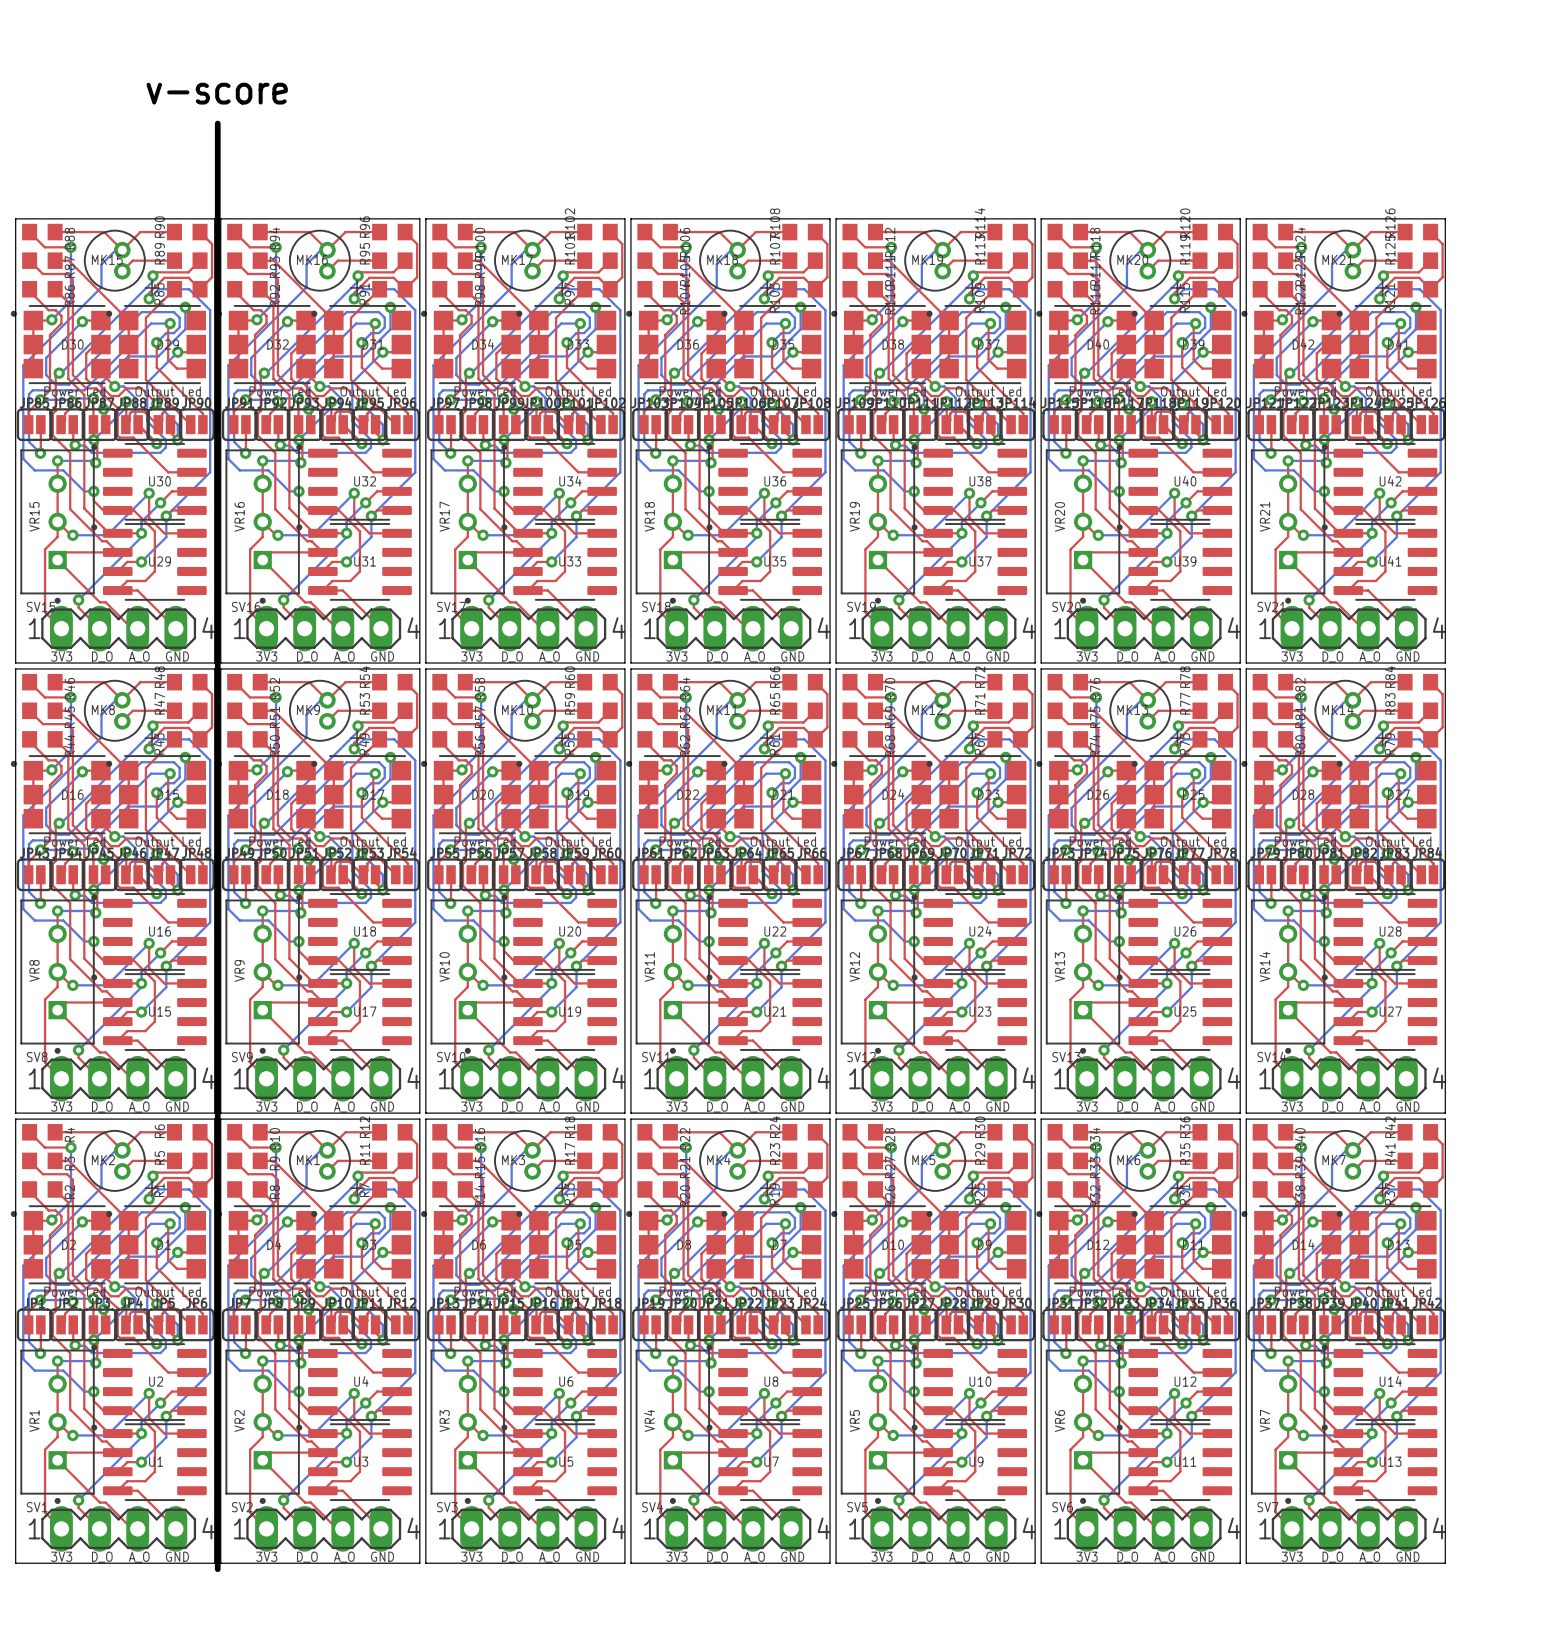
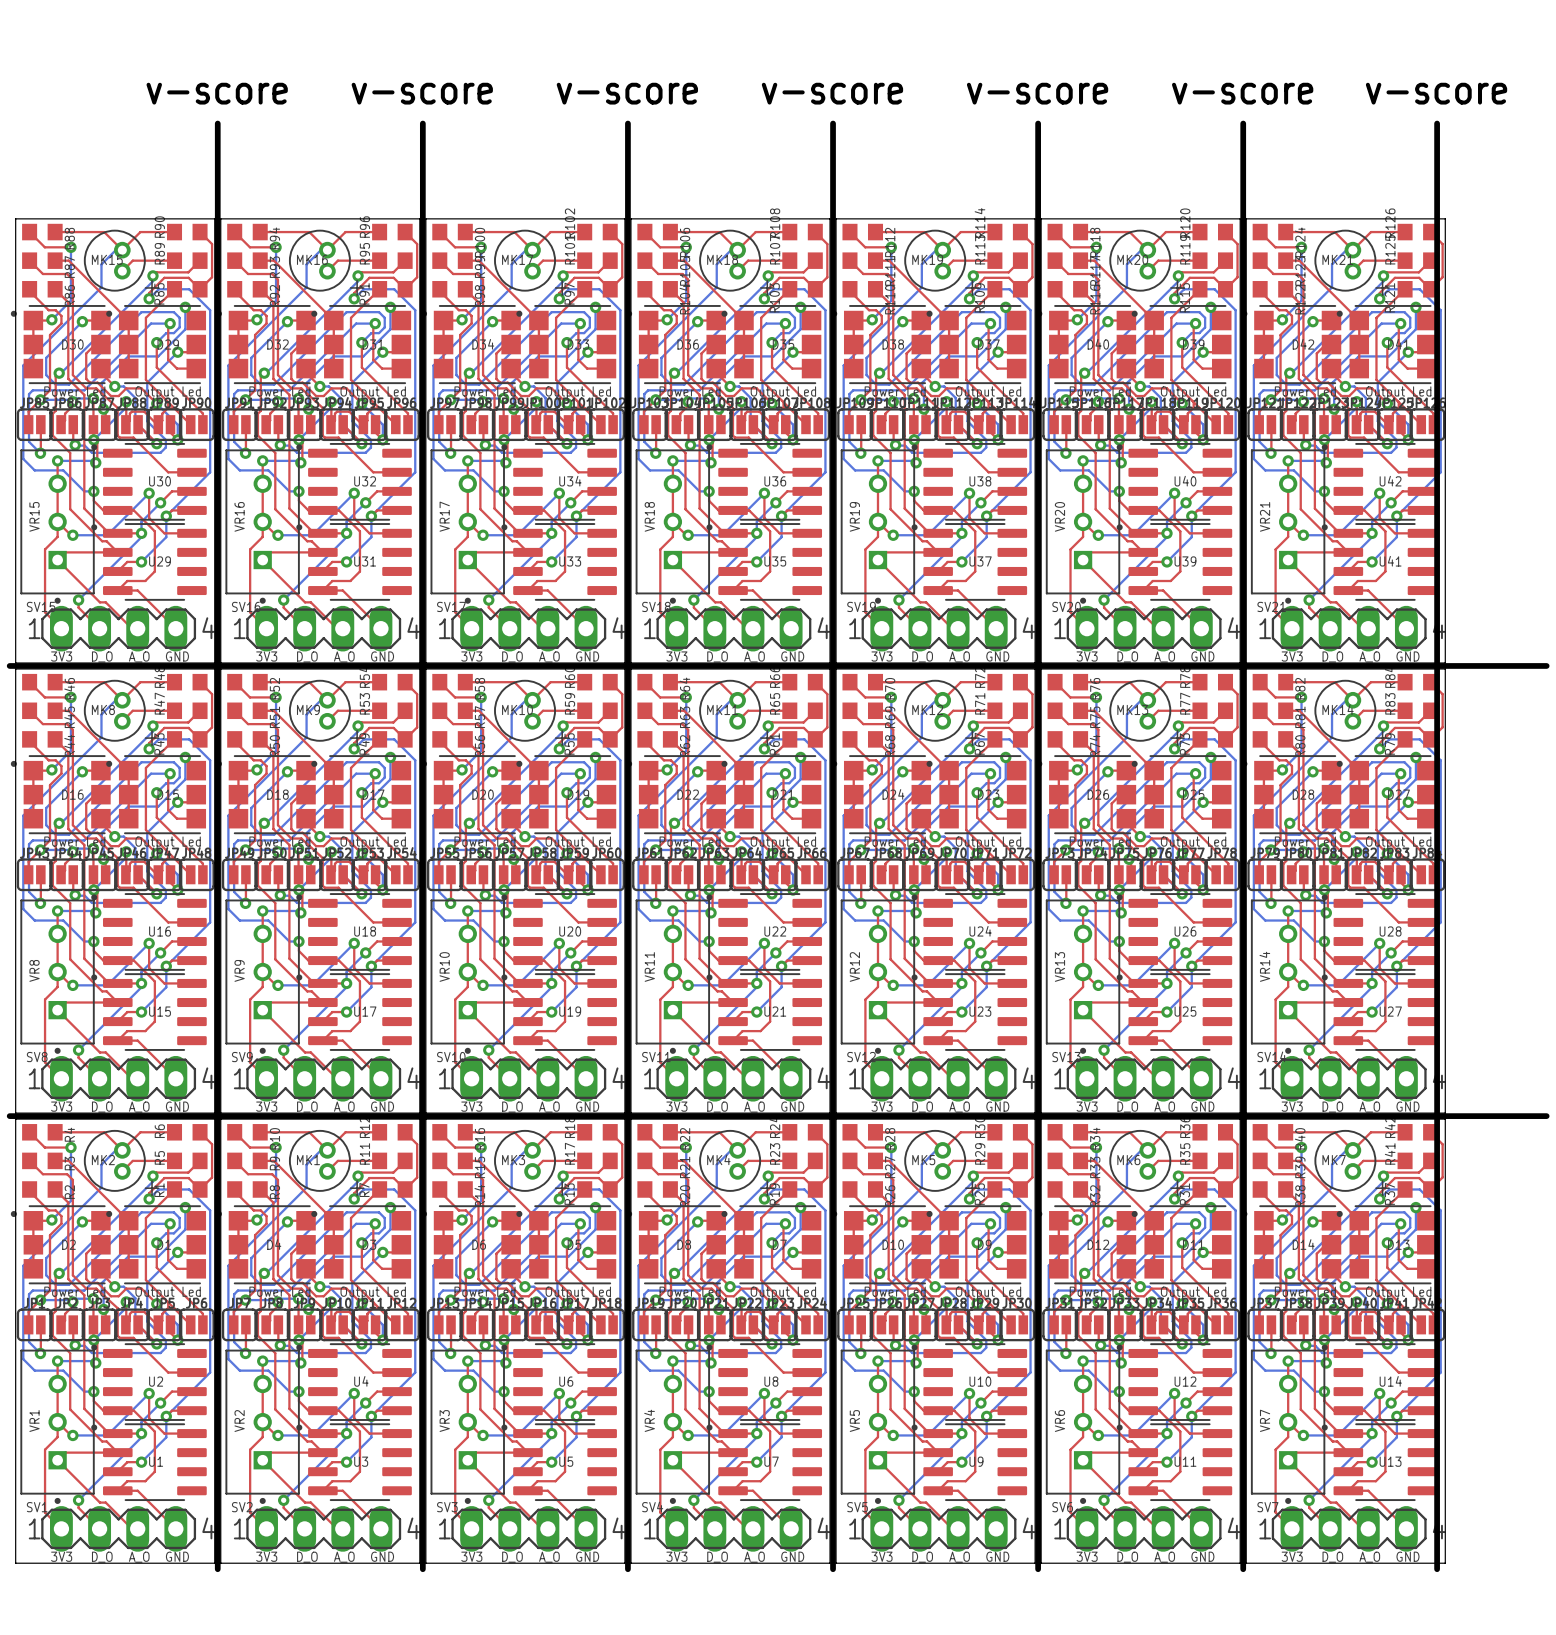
text: none -> v-score (422, 93)
text: none -> v-score (627, 93)
text: none -> v-score (832, 93)
text: none -> v-score (1037, 93)
text: none -> v-score (1242, 93)
text: none -> v-score (1436, 93)
board edge: none -> (422, 123) (422, 1569)
board edge: none -> (627, 123) (627, 1569)
board edge: none -> (833, 123) (833, 1569)
board edge: none -> (1038, 123) (1038, 1569)
board edge: none -> (1243, 123) (1243, 1569)
board edge: none -> (1437, 123) (1437, 1569)
board edge: none -> (9, 665) (1546, 665)
board edge: none -> (9, 1116) (1546, 1116)

